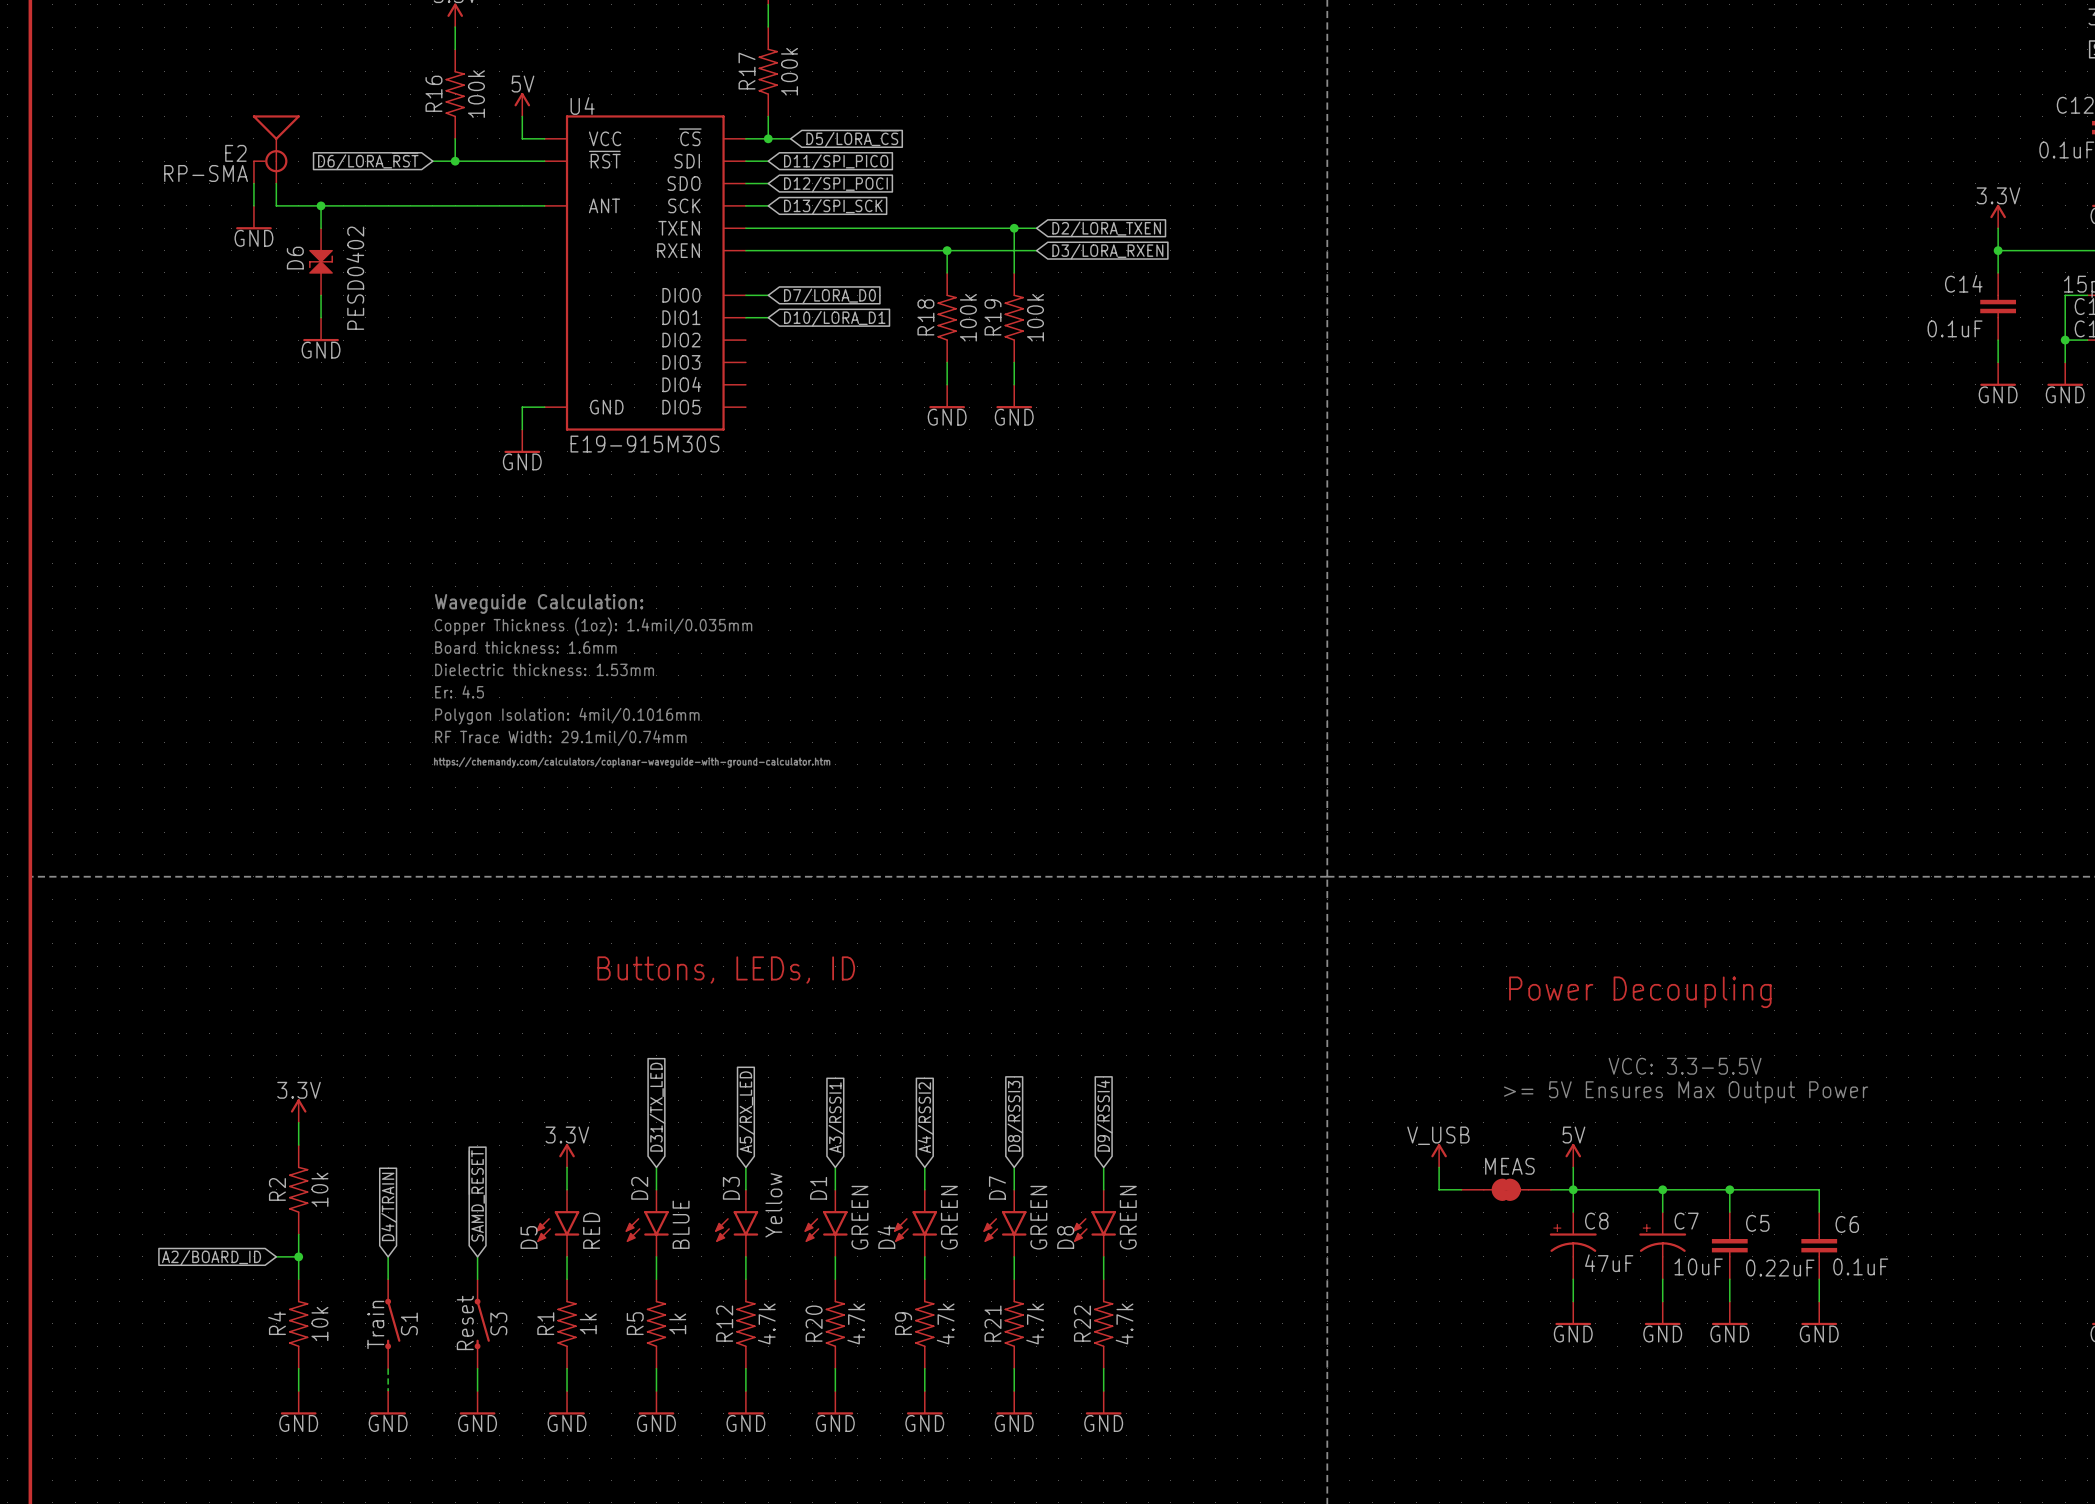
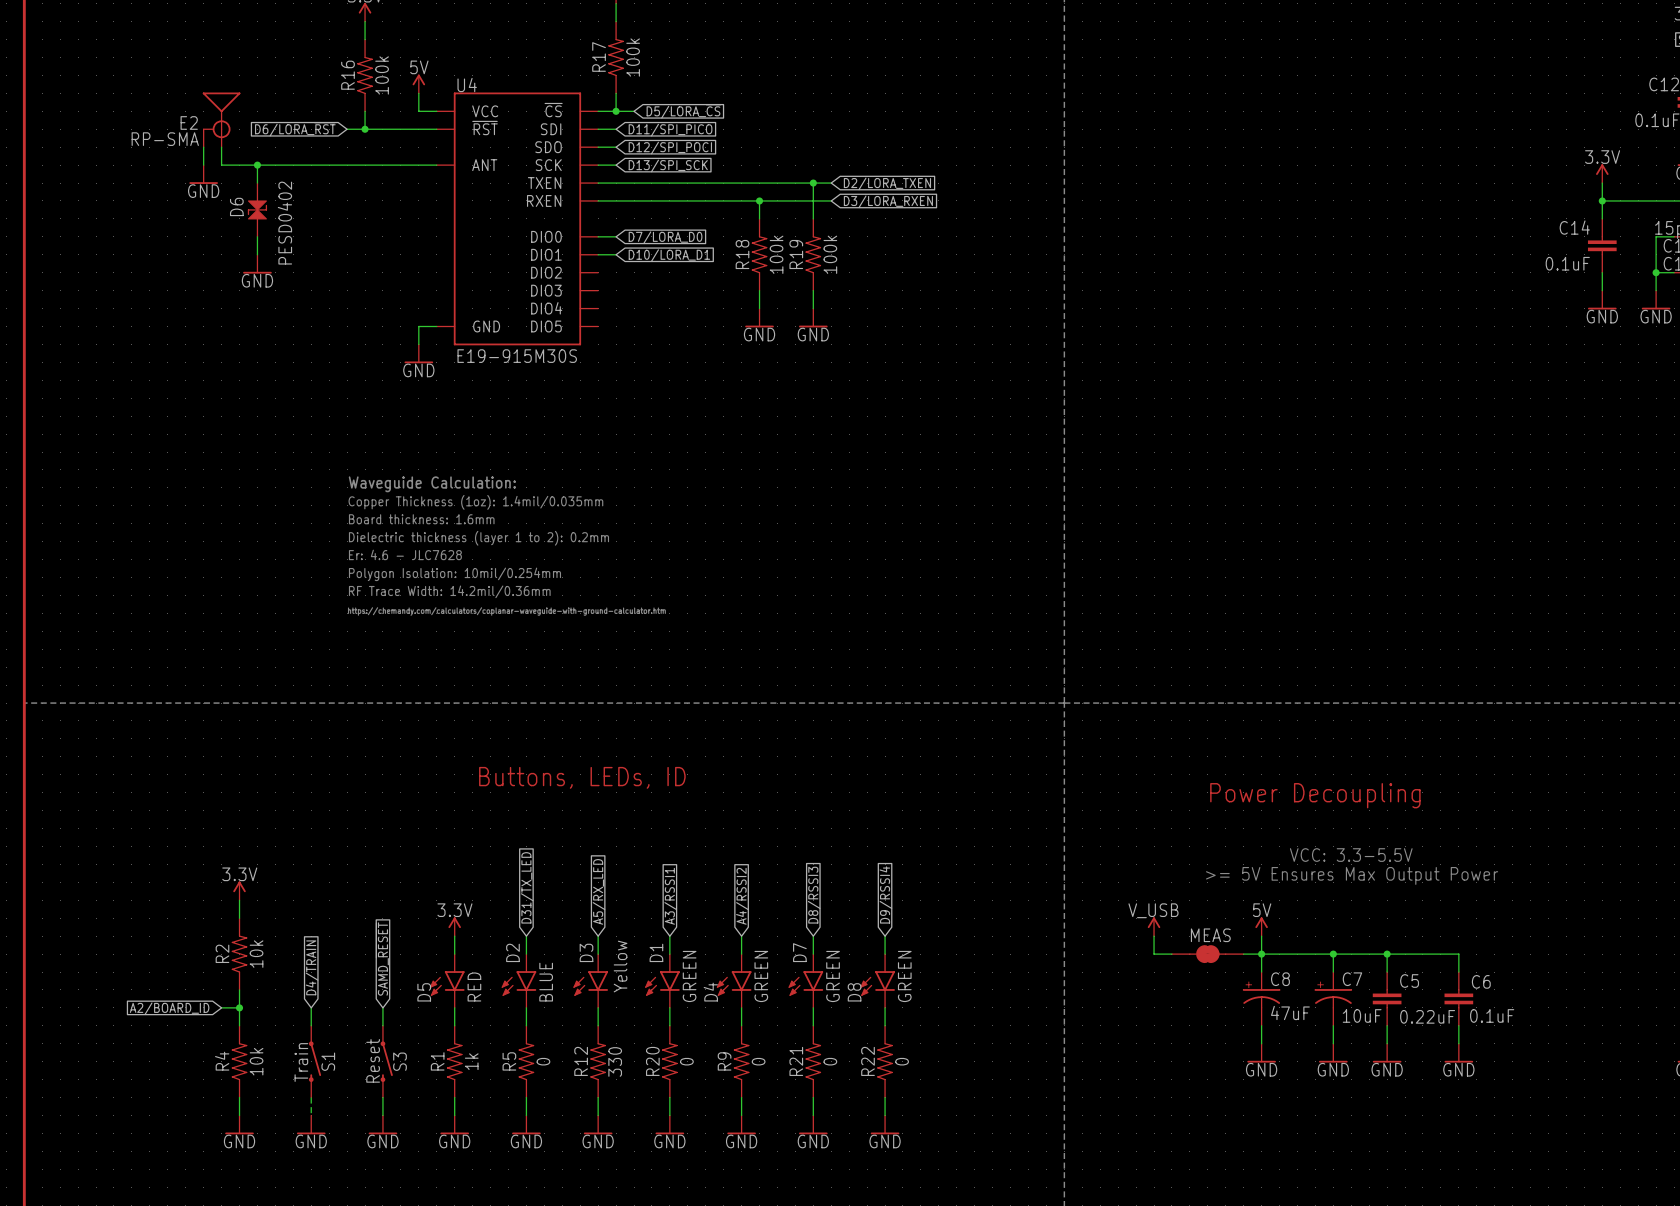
text: Dielectric thickness: 1.53mm (544, 669) -> Dielectric thickness (layer 1 to 2): 0.2mm (478, 538)
text: Er: 4.5 (459, 691) -> Er: 4.6 - JLC7628 (405, 554)
text: Polygon Isolation: 4mil/0.1016mm (567, 716) -> Polygon Isolation: 10mil/0.254mm (454, 574)
text: RF Trace Width: 29.1mil/0.74mm (560, 738) -> RF Trace Width: 14.2mil/0.36mm (449, 591)
R5 value: 1k (677, 1323) -> 0 (543, 1061)
R12 value: 4.7k (766, 1323) -> 330 (615, 1061)
R20 value: 4.7k (856, 1323) -> 0 (686, 1061)
R9 value: 4.7k (945, 1323) -> 0 (758, 1061)
R21 value: 4.7k (1035, 1323) -> 0 (830, 1061)
R22 value: 4.7k (1124, 1323) -> 0 (902, 1061)

